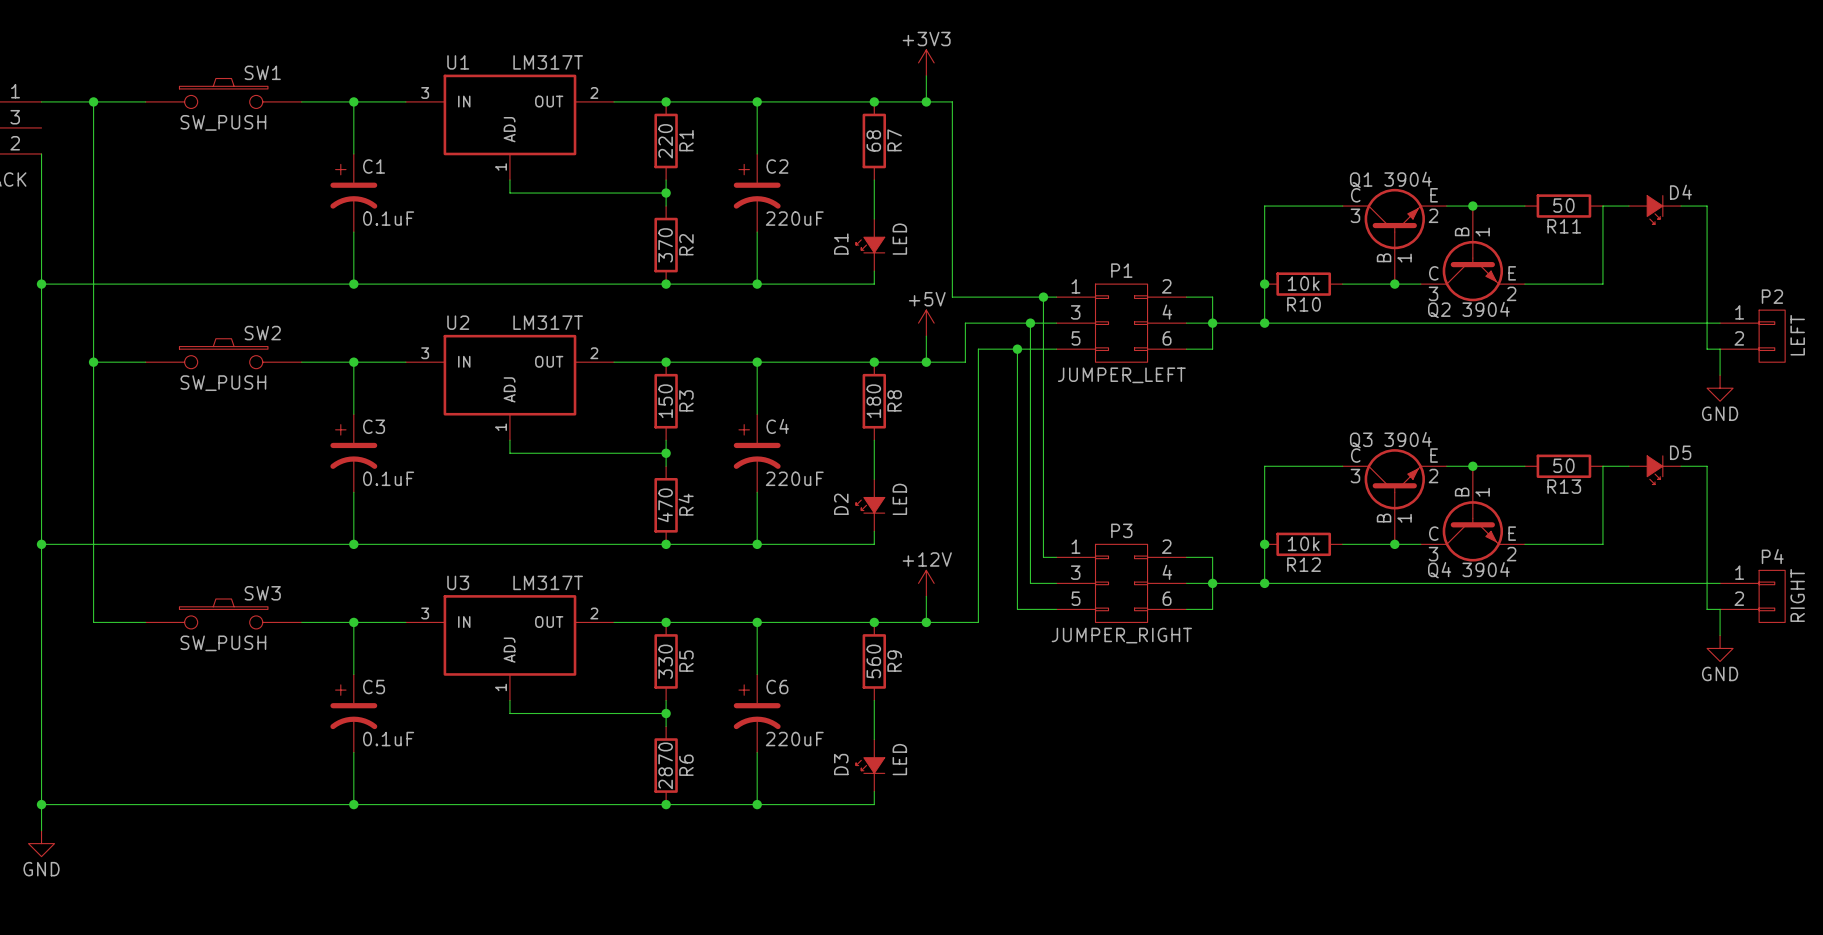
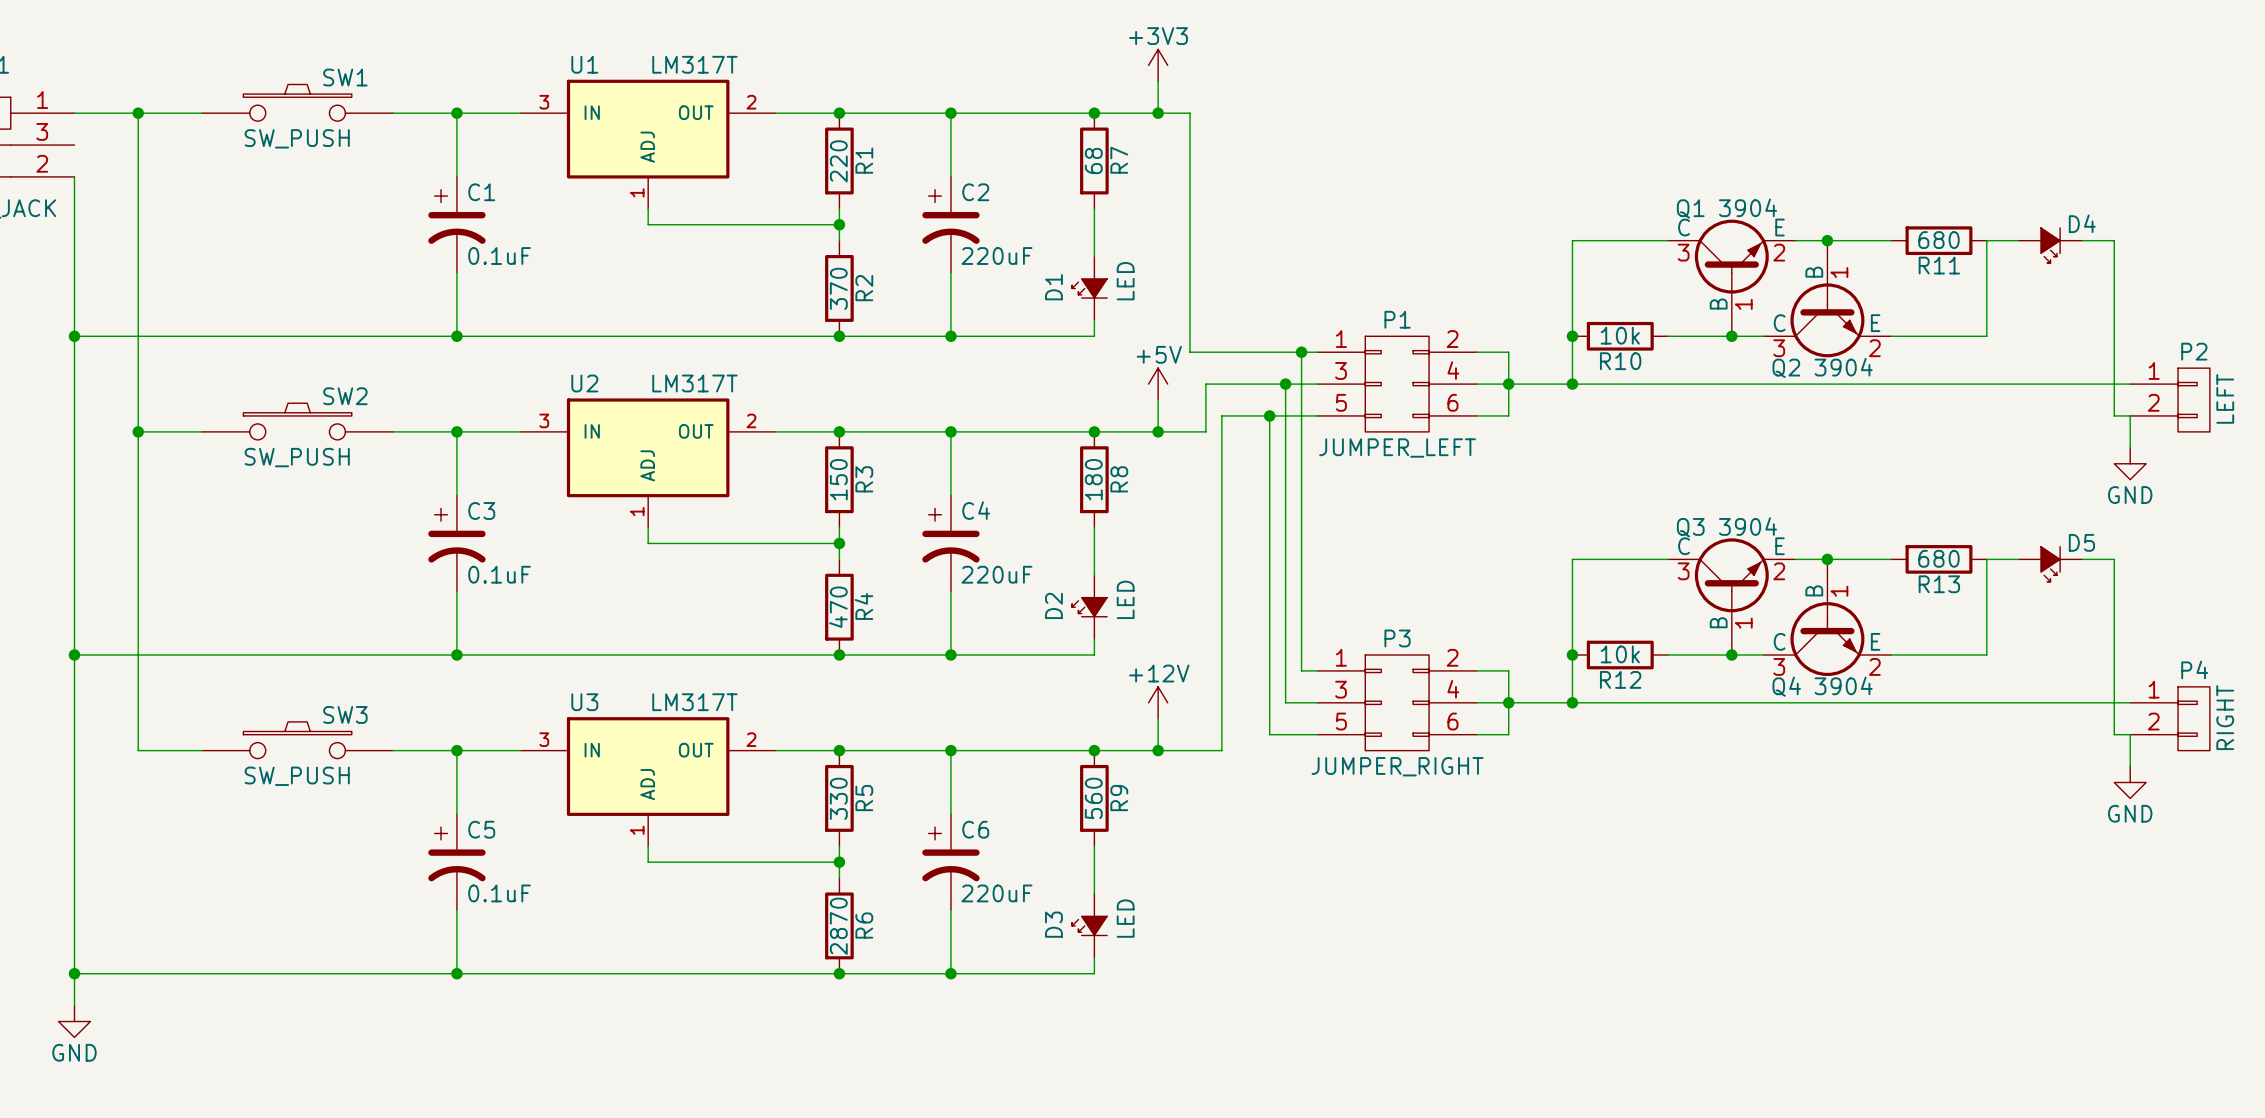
R11 value: 50 (1563, 205) -> 680 (1938, 240)
R13 value: 50 (1563, 465) -> 680 (1938, 558)

